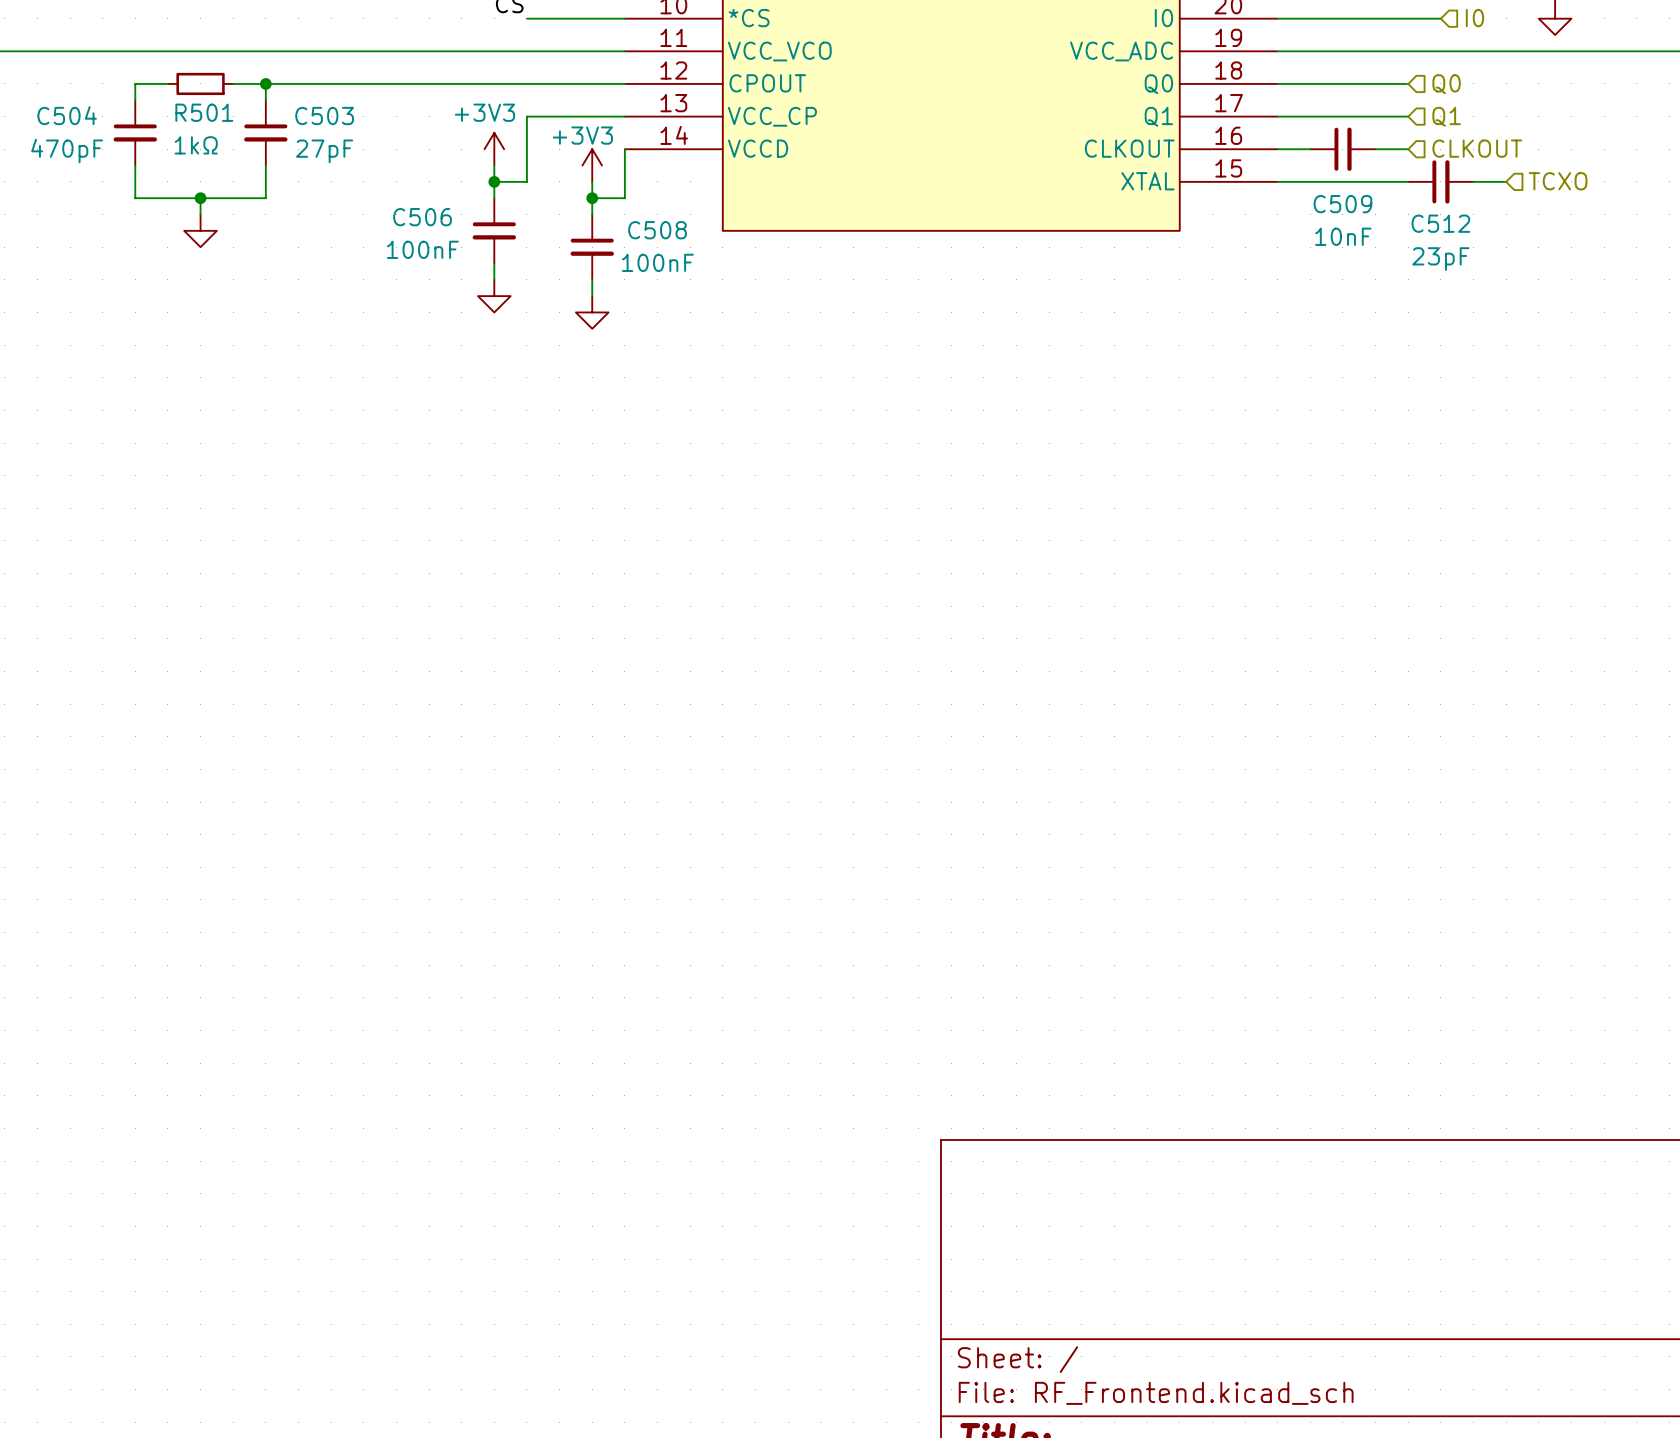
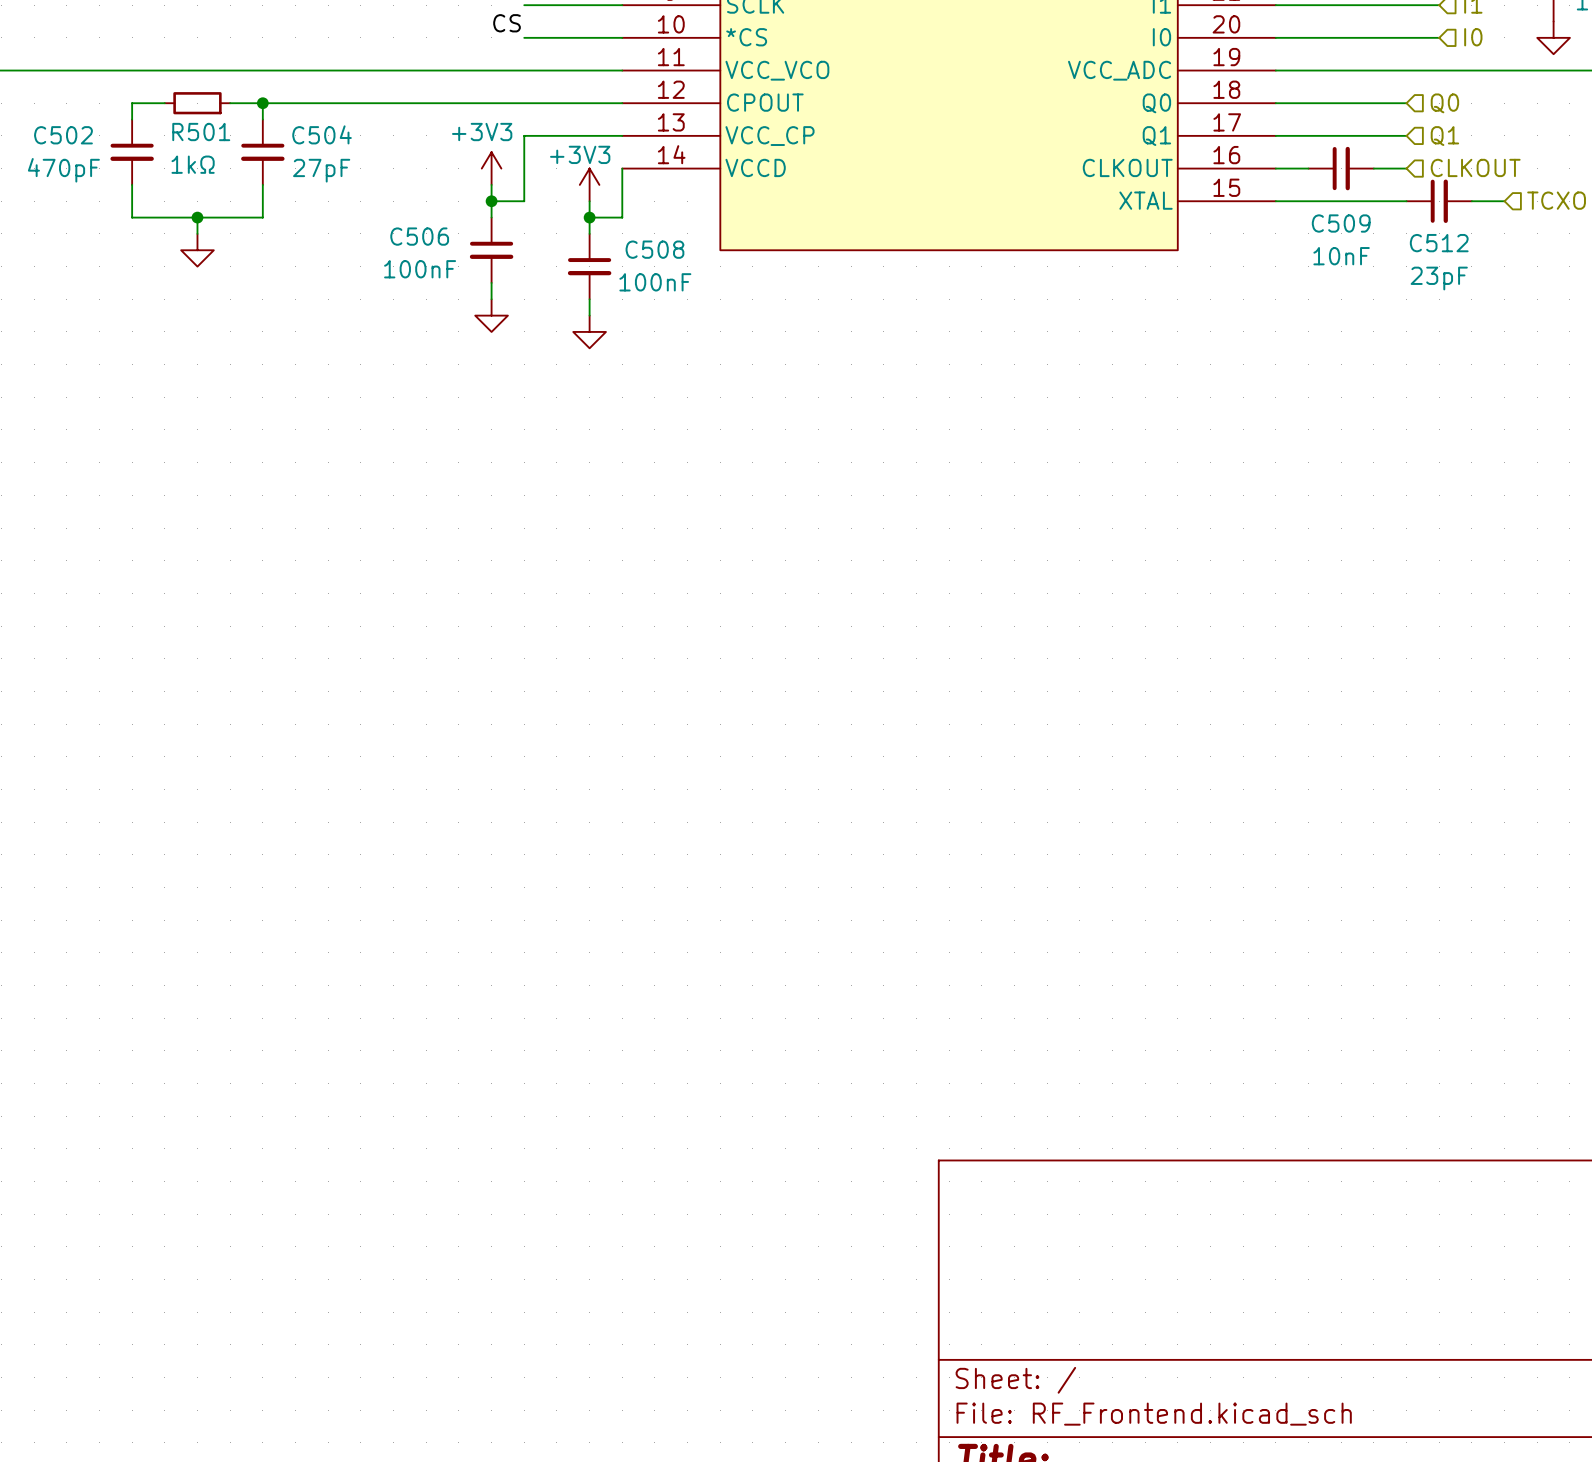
C504 name: C504 (67, 115) -> C502 (63, 135)
C503 name: C503 (324, 115) -> C504 (322, 134)

